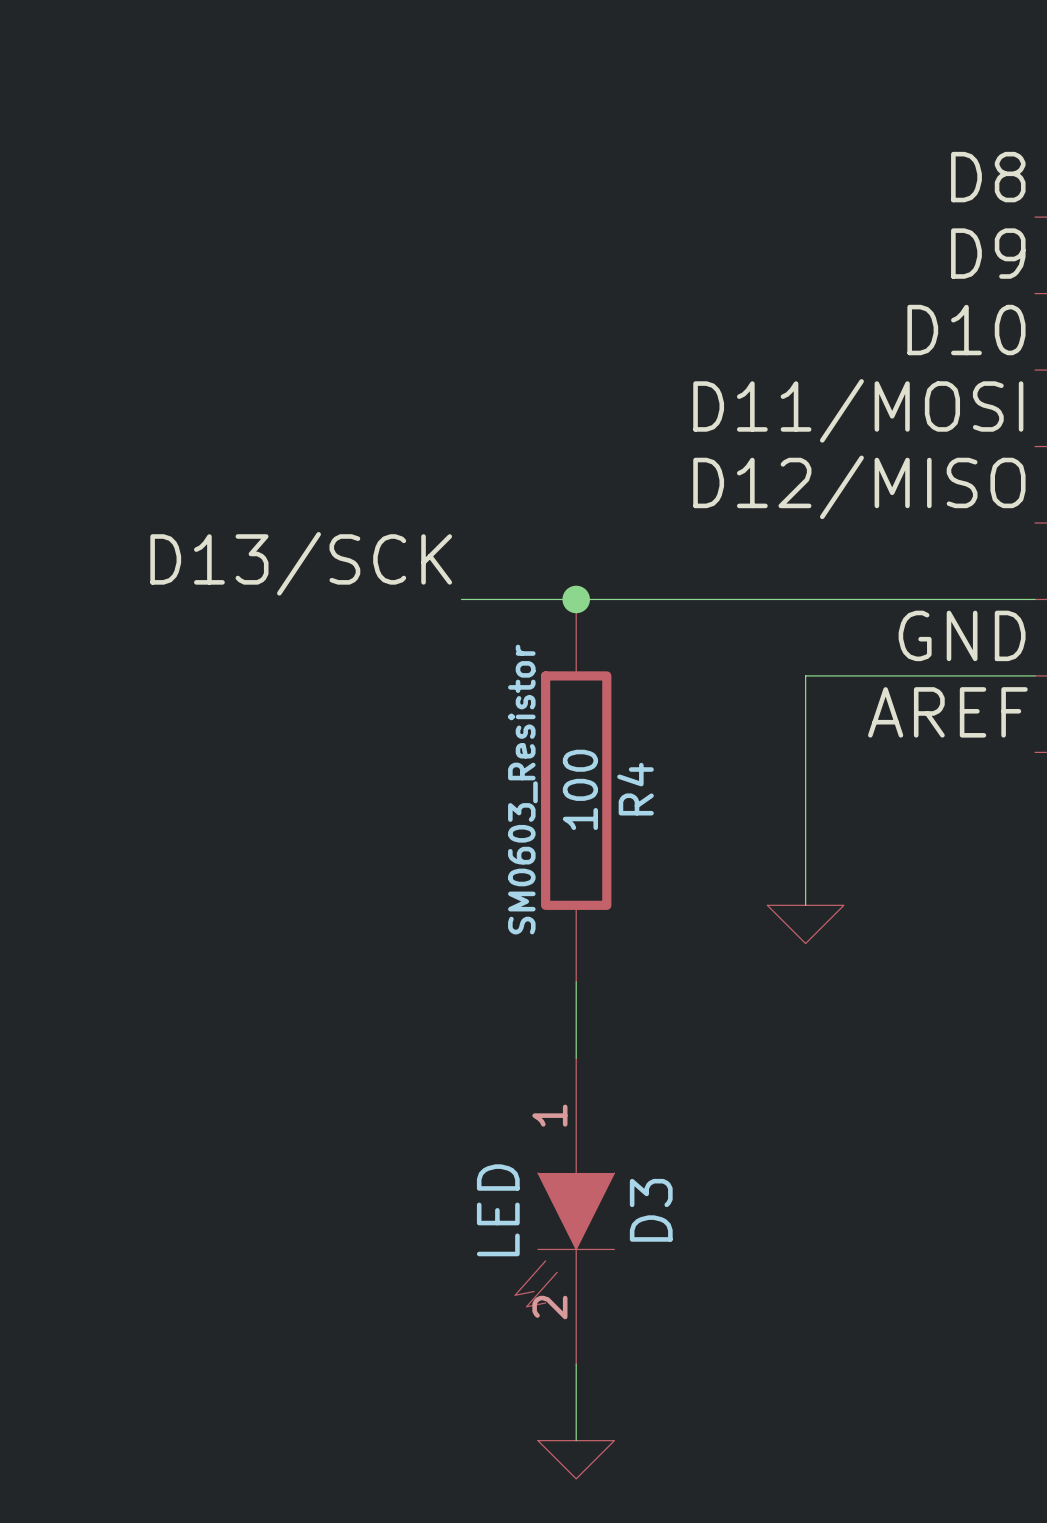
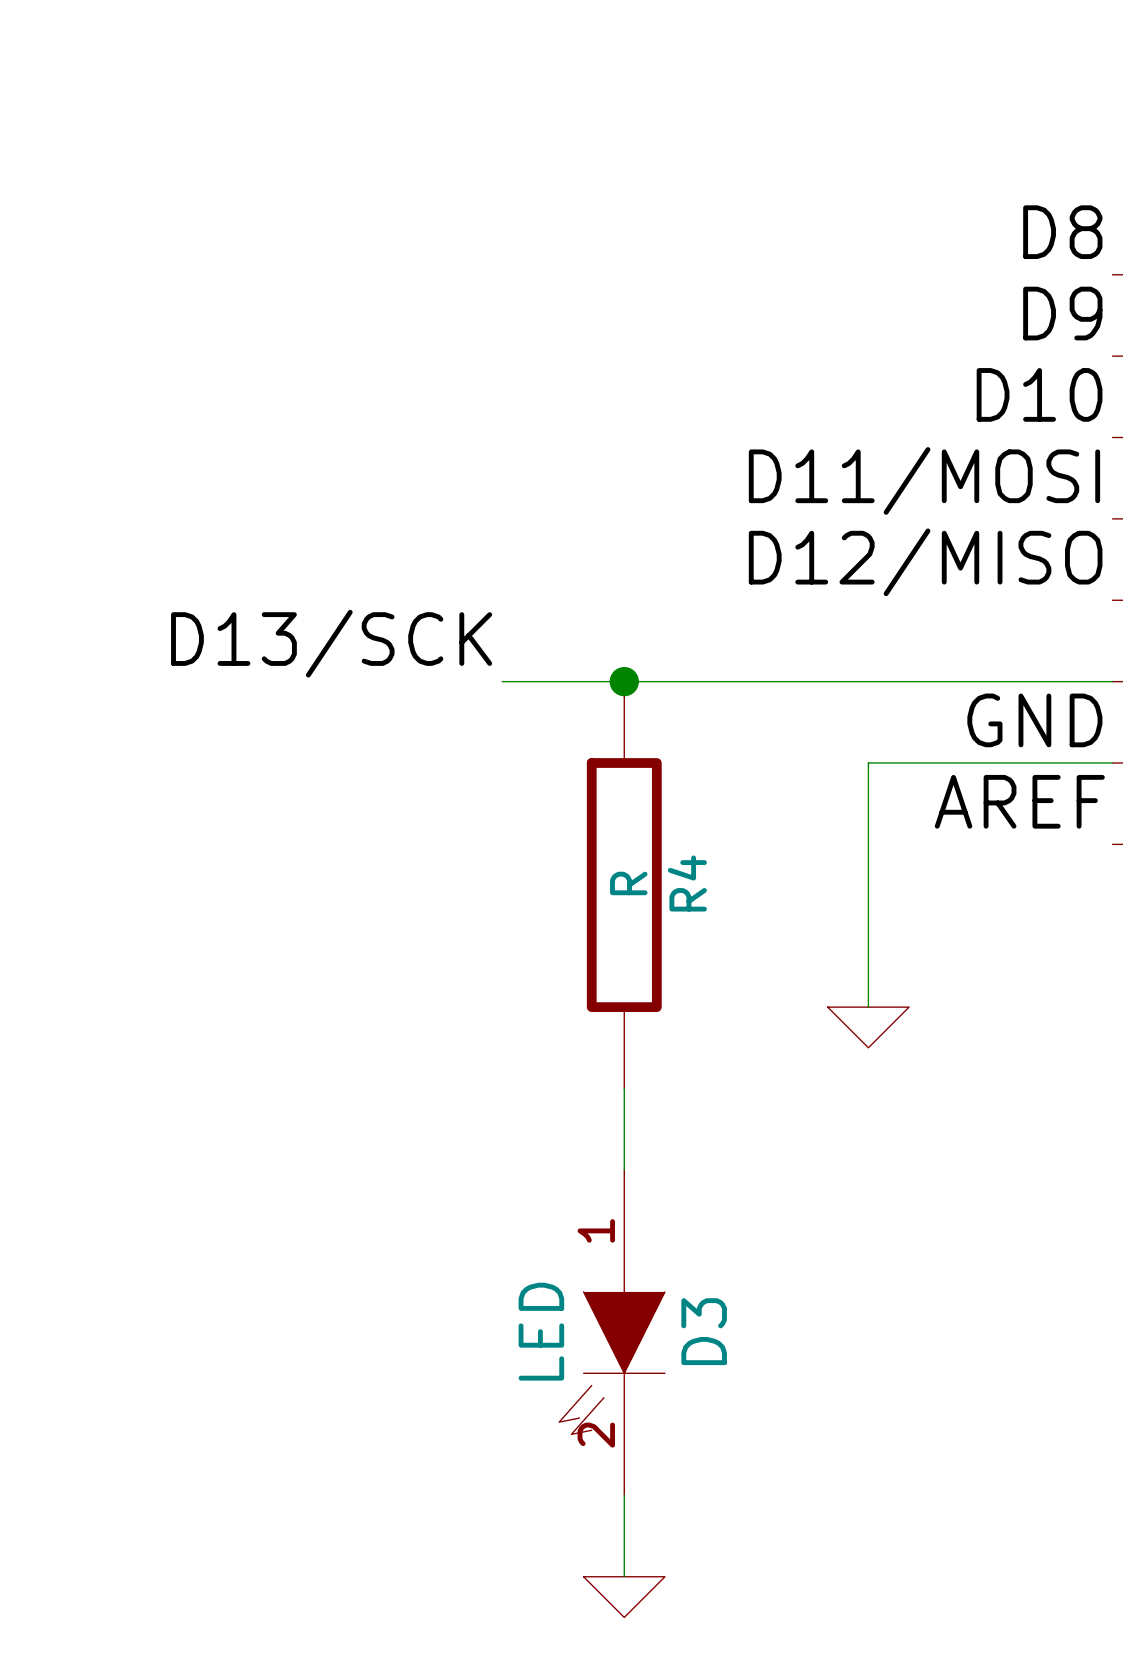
R4 text: SM0603_Resistor (522, 789) -> none
R4 value: 100 (580, 789) -> R (628, 883)

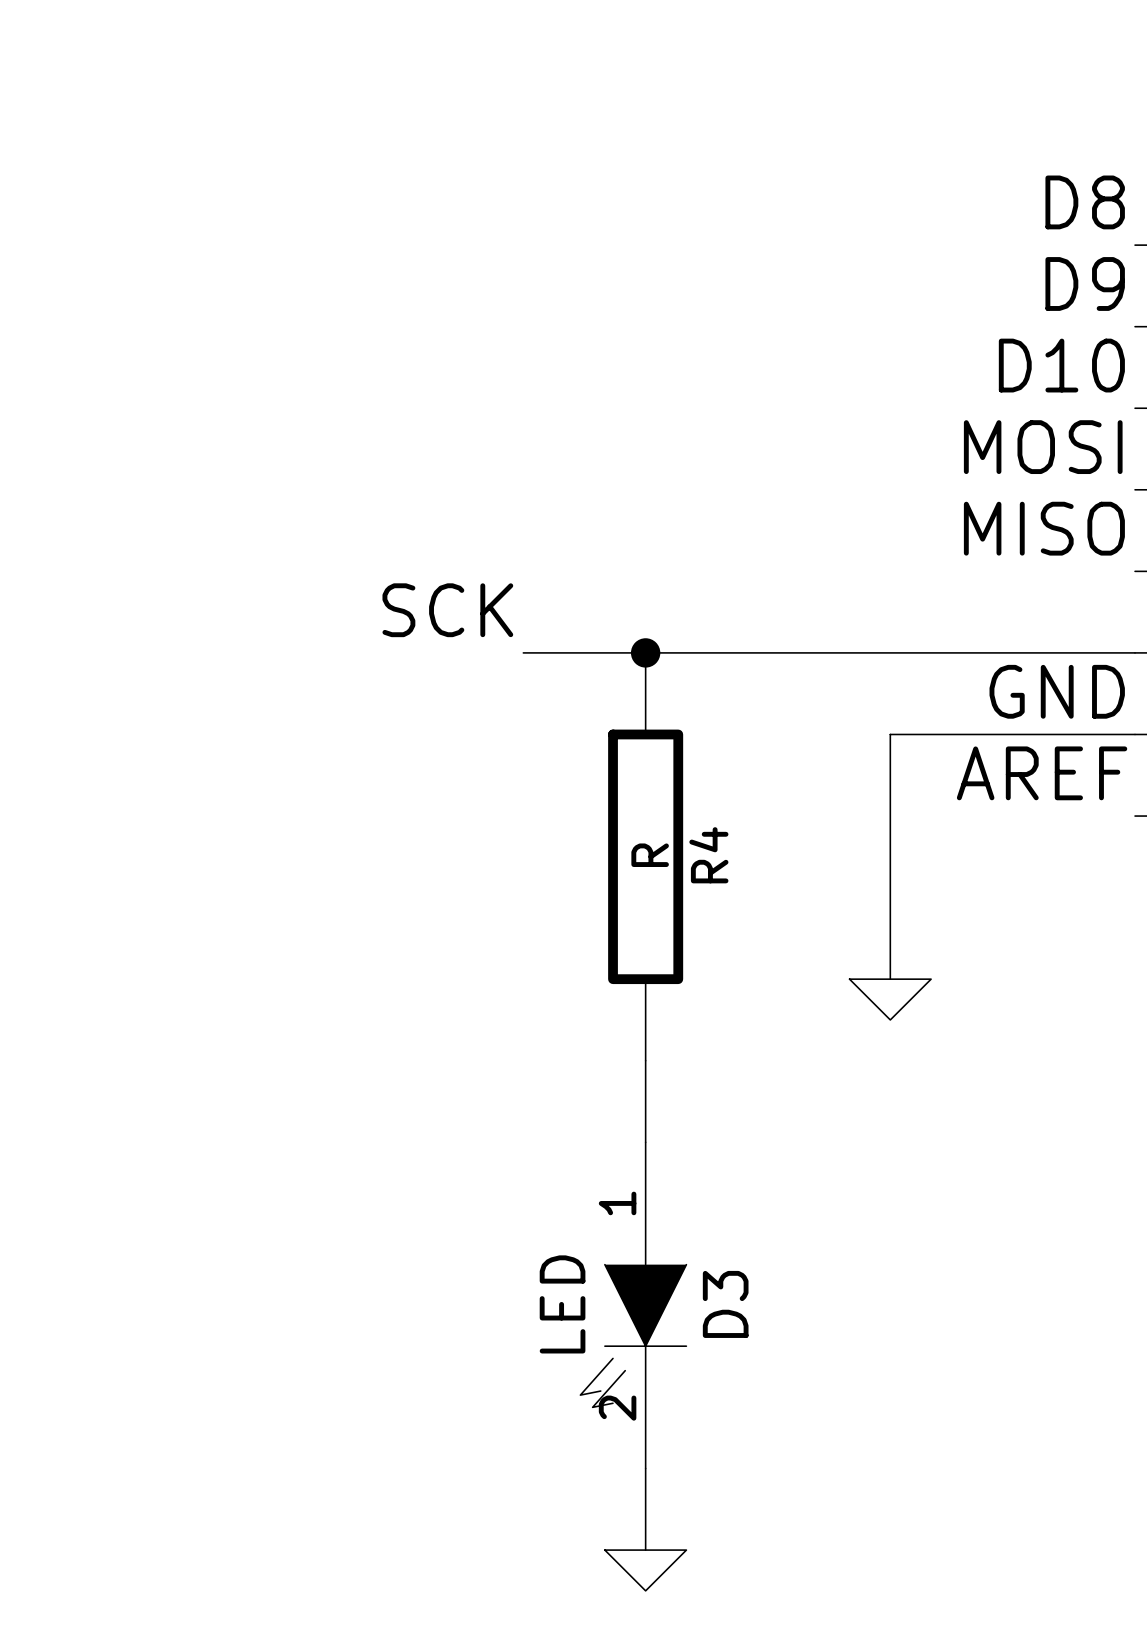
label: D11/MOSI (924, 480) -> MOSI (1043, 447)
label: D12/MISO (925, 562) -> MISO (1044, 528)
label: D13/SCK (331, 643) -> SCK (447, 610)

